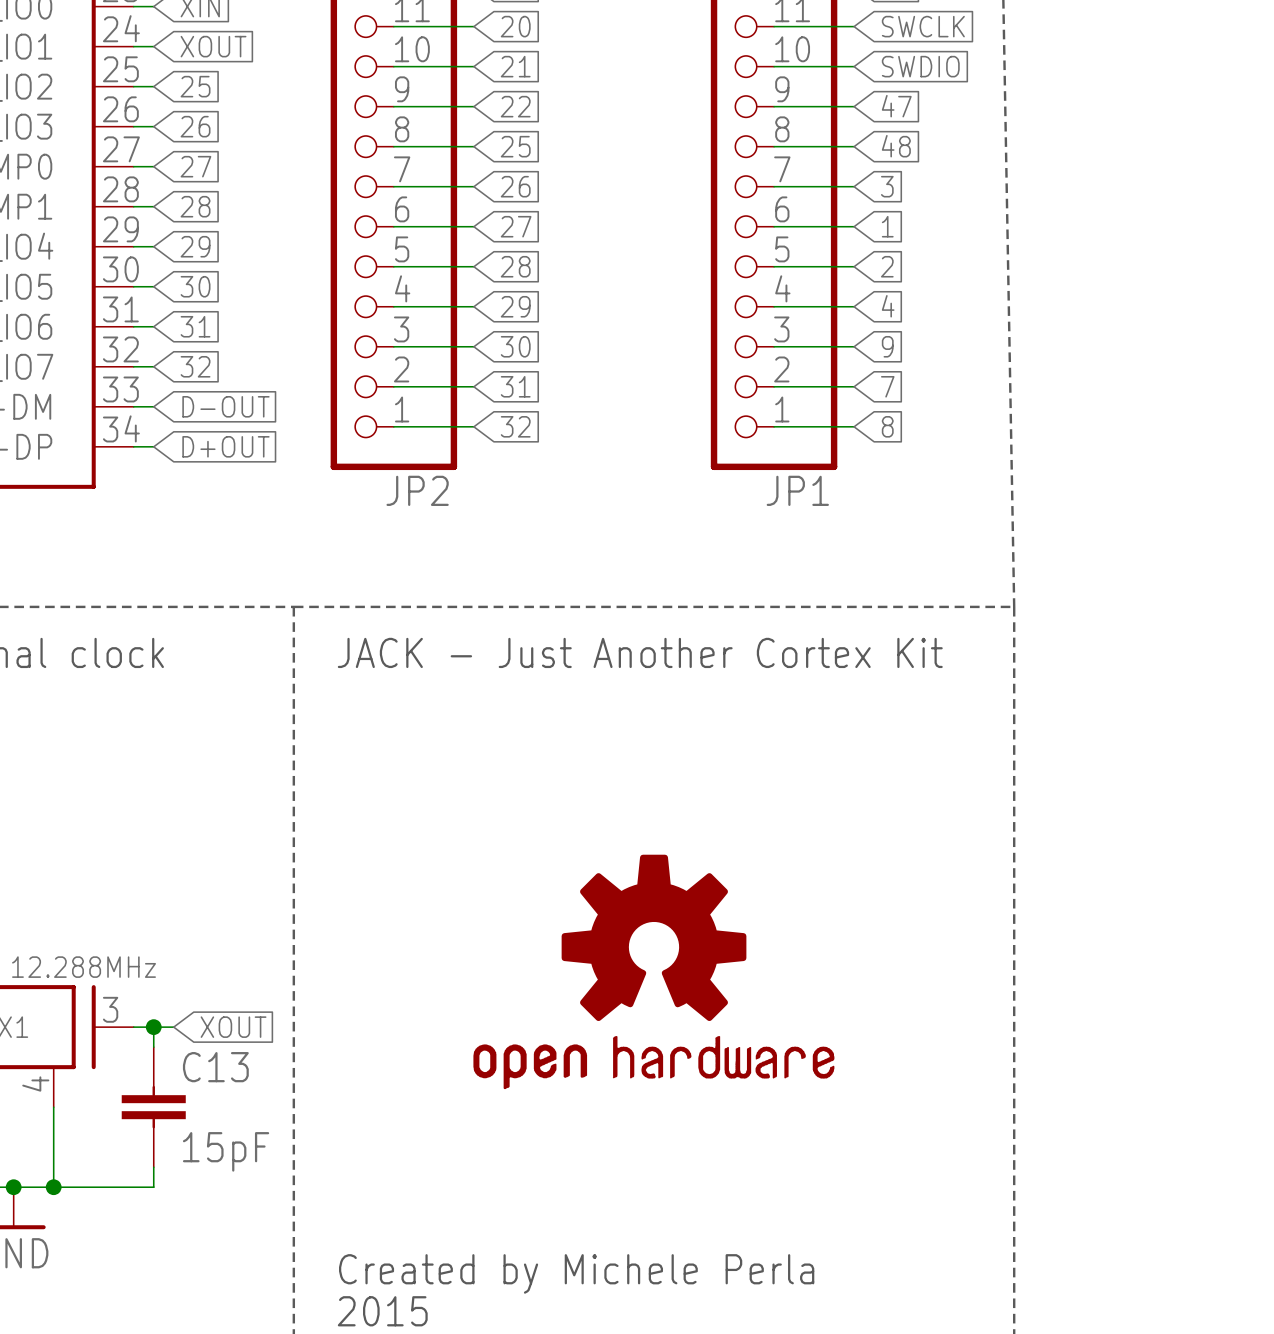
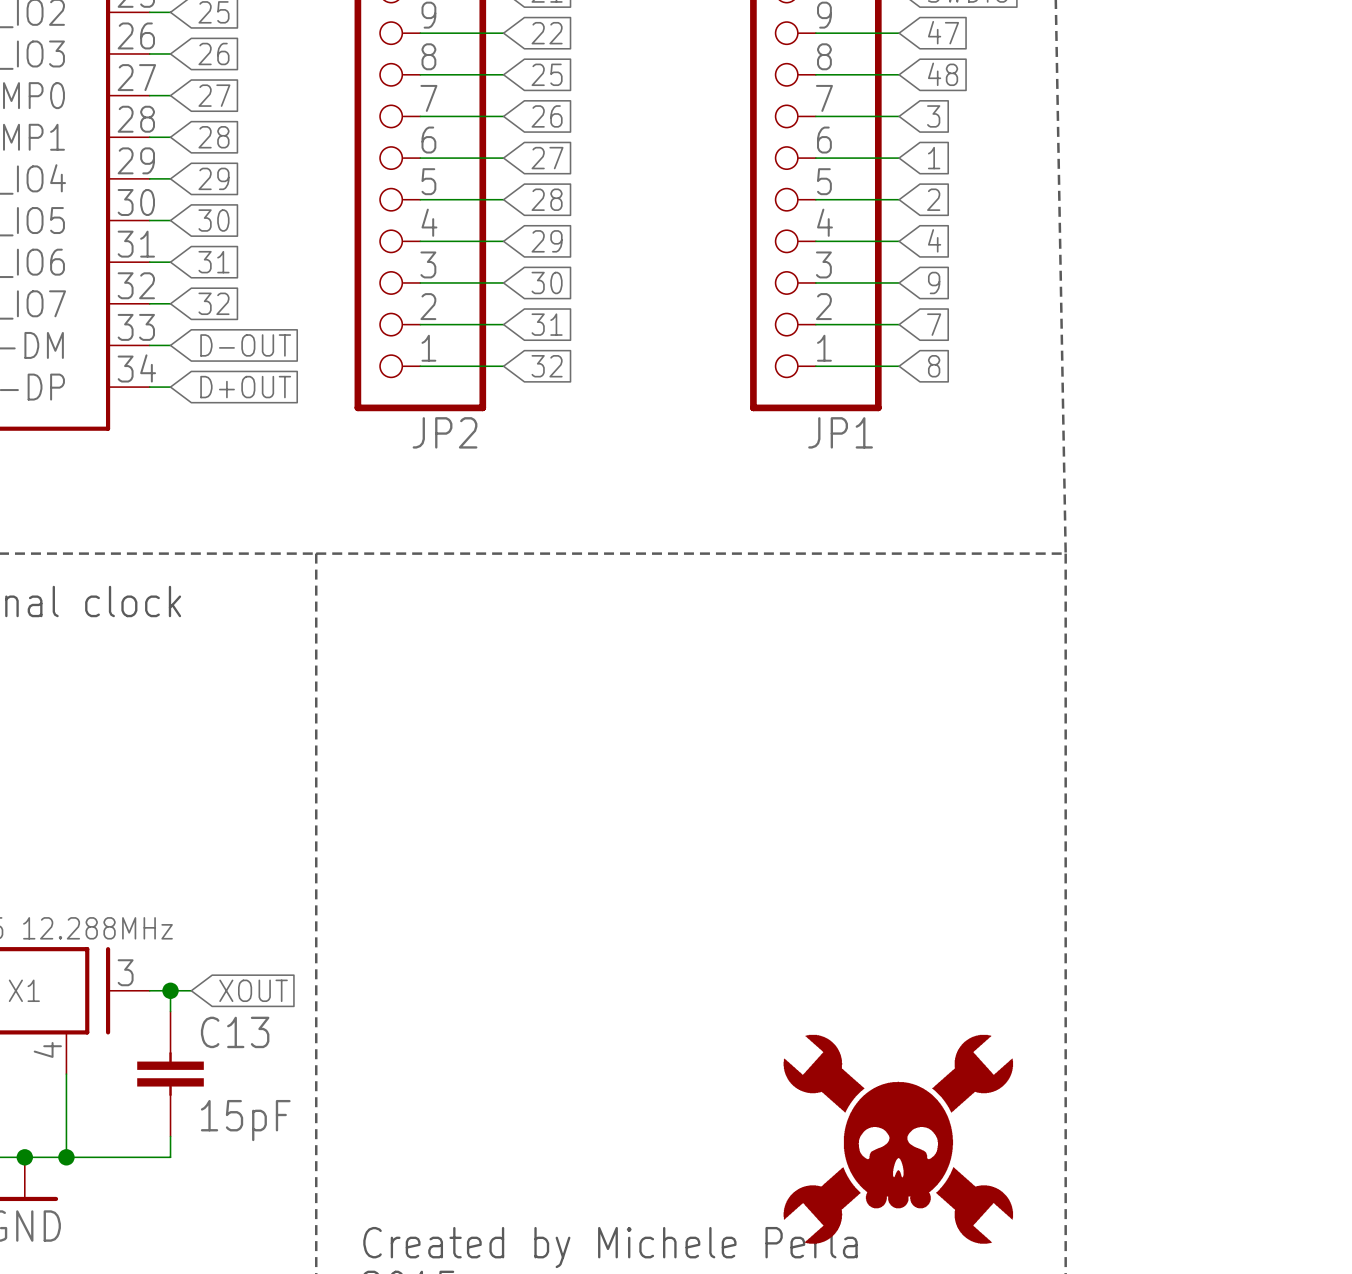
text: JACK - Just Another Cortex Kit (640, 652) -> none
part: (653, 971) -> none
part: none -> (898, 1139)

